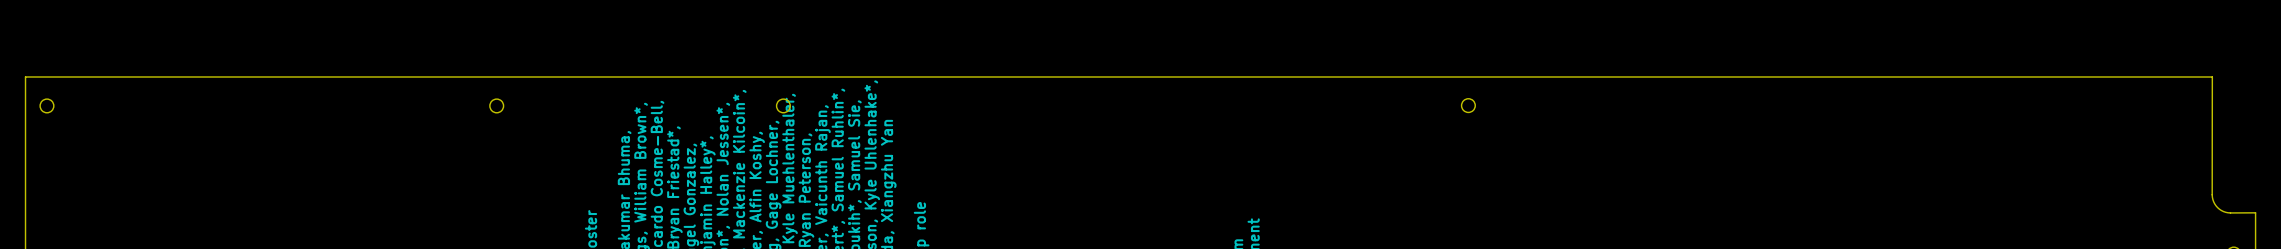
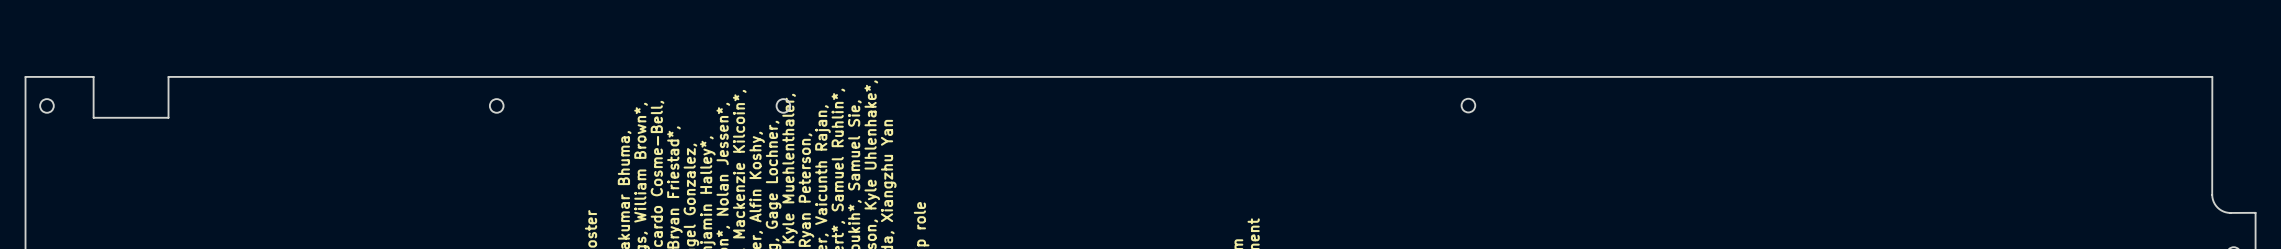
board edge: (2212, 76) (25, 76) -> (2212, 76) (168, 76) (168, 117) (93, 117) (93, 76) (25, 76)

